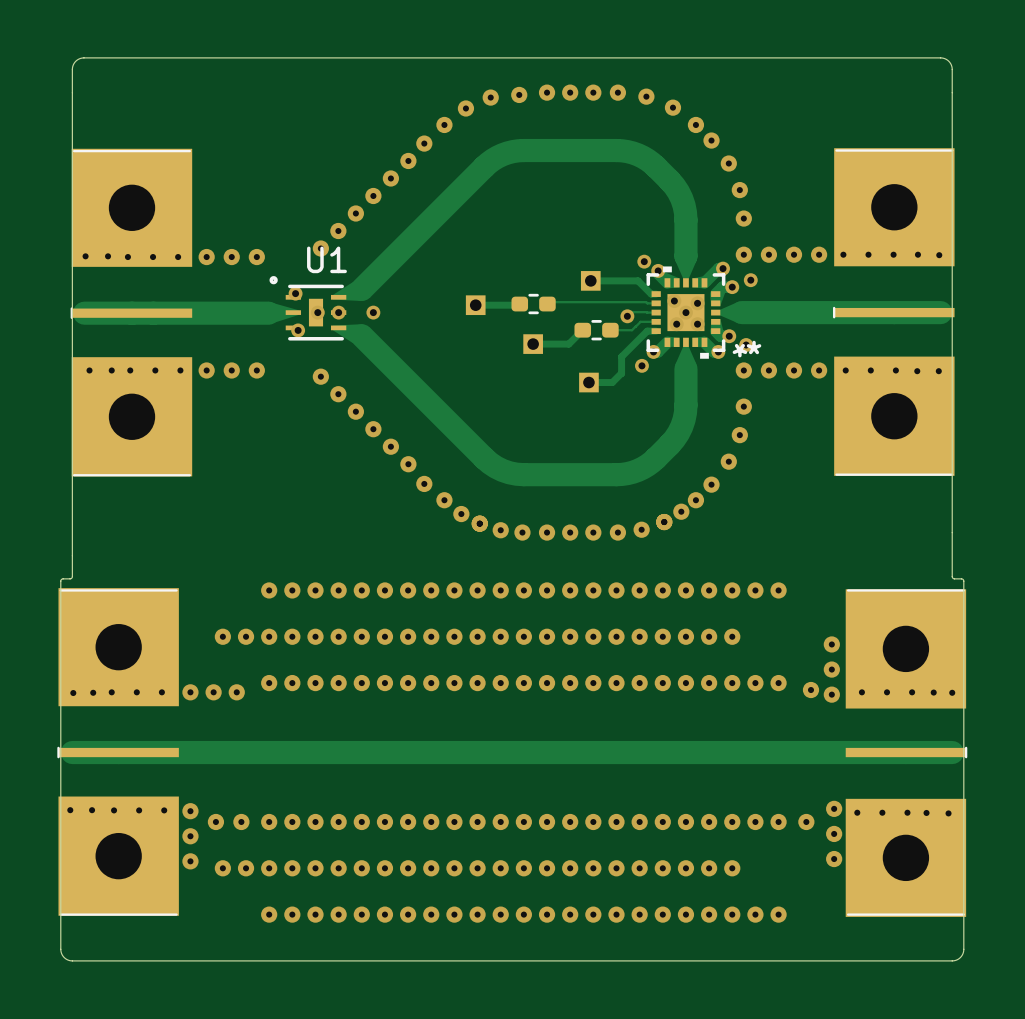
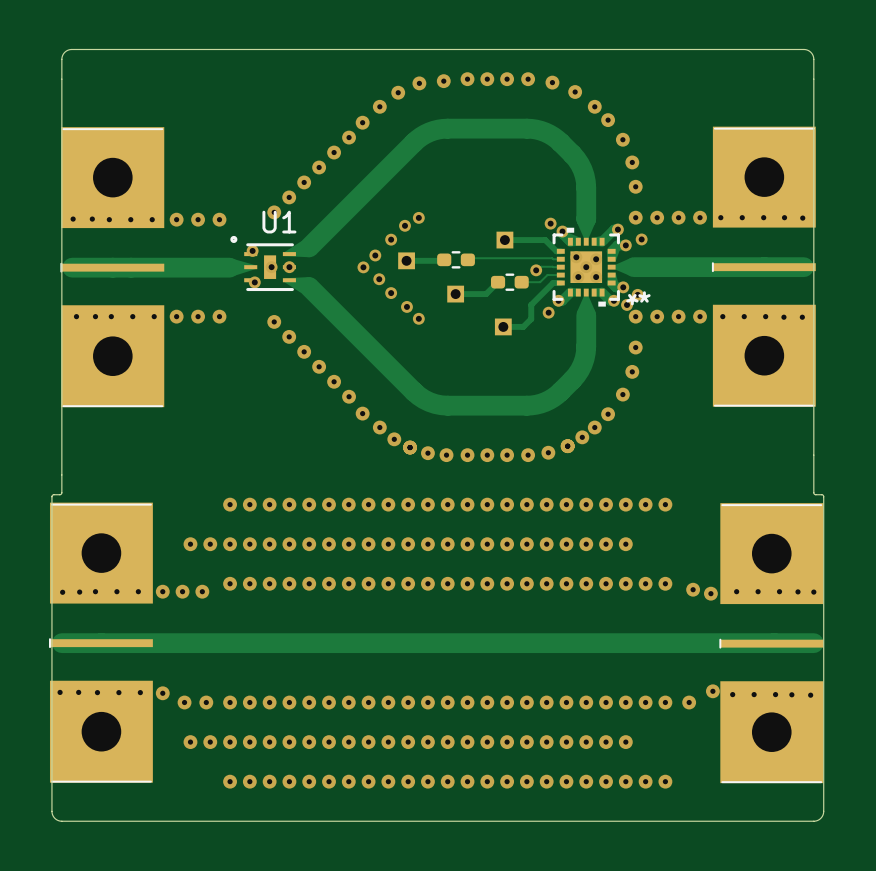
via: none -> (418, 217)
via: none -> (404, 225)
via: none -> (391, 239)
via: none -> (375, 255)
via: (373, 312) -> none
via: none -> (363, 267)
via: none -> (379, 279)
via: none -> (391, 293)
via: none -> (627, 304)
via: none -> (406, 306)
via: none -> (418, 318)
via: (831, 644) -> none
via: (831, 669) -> none
part rotation: 0° (906, 753) -> 180° (771, 643)
via: (834, 833) -> none
via: (190, 836) -> none
via: (834, 859) -> none
via: (190, 861) -> none

